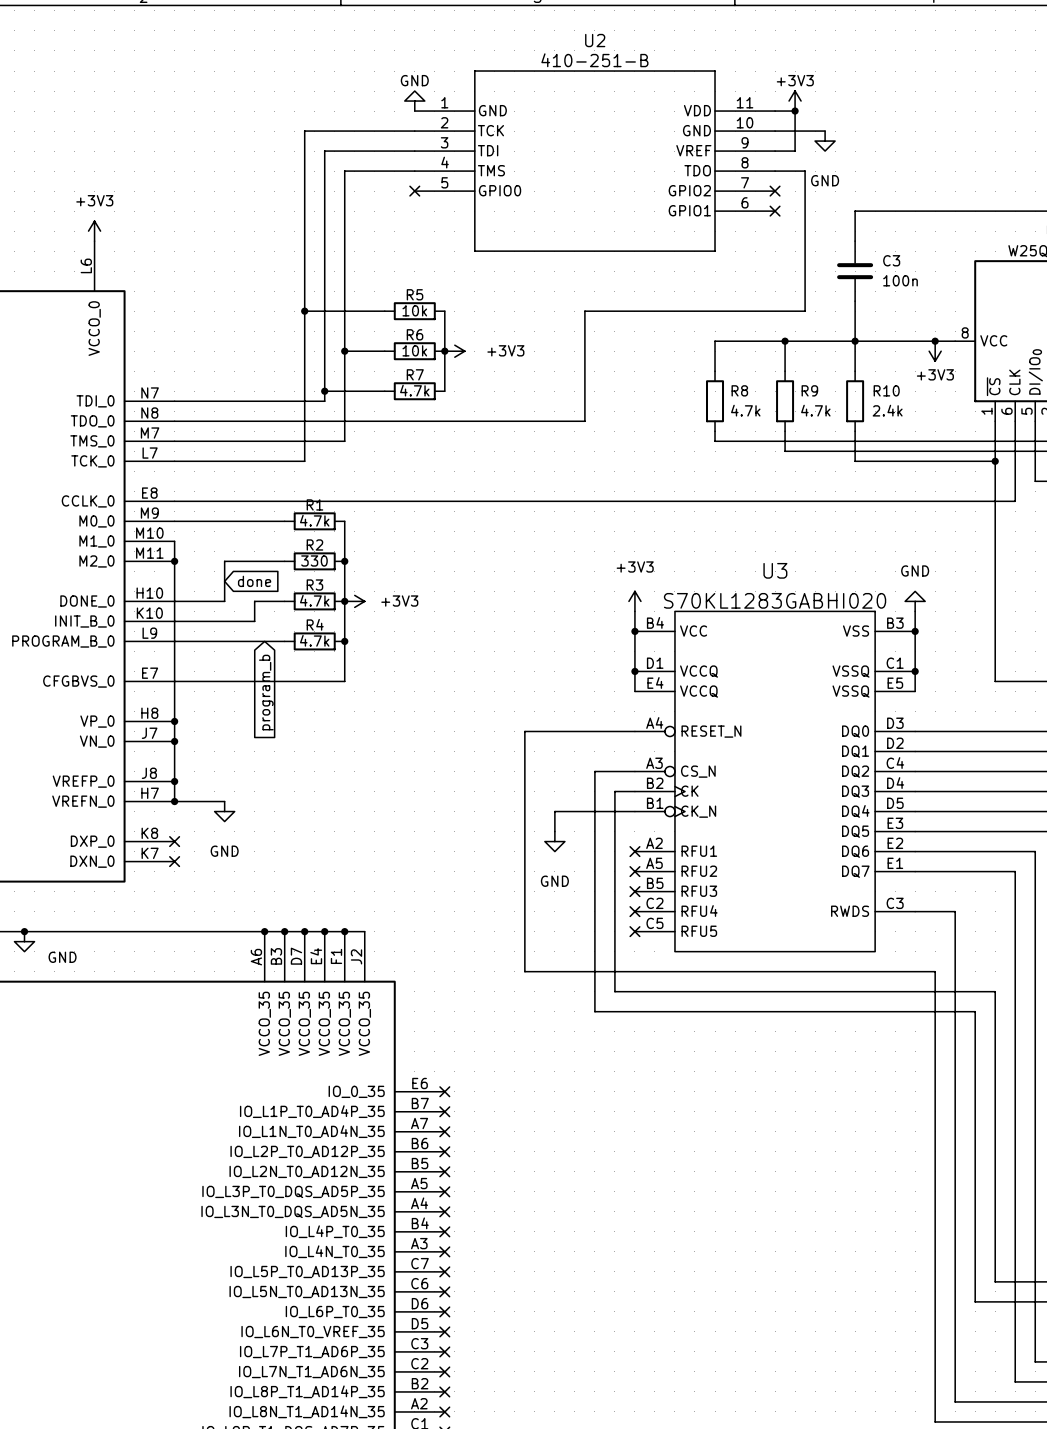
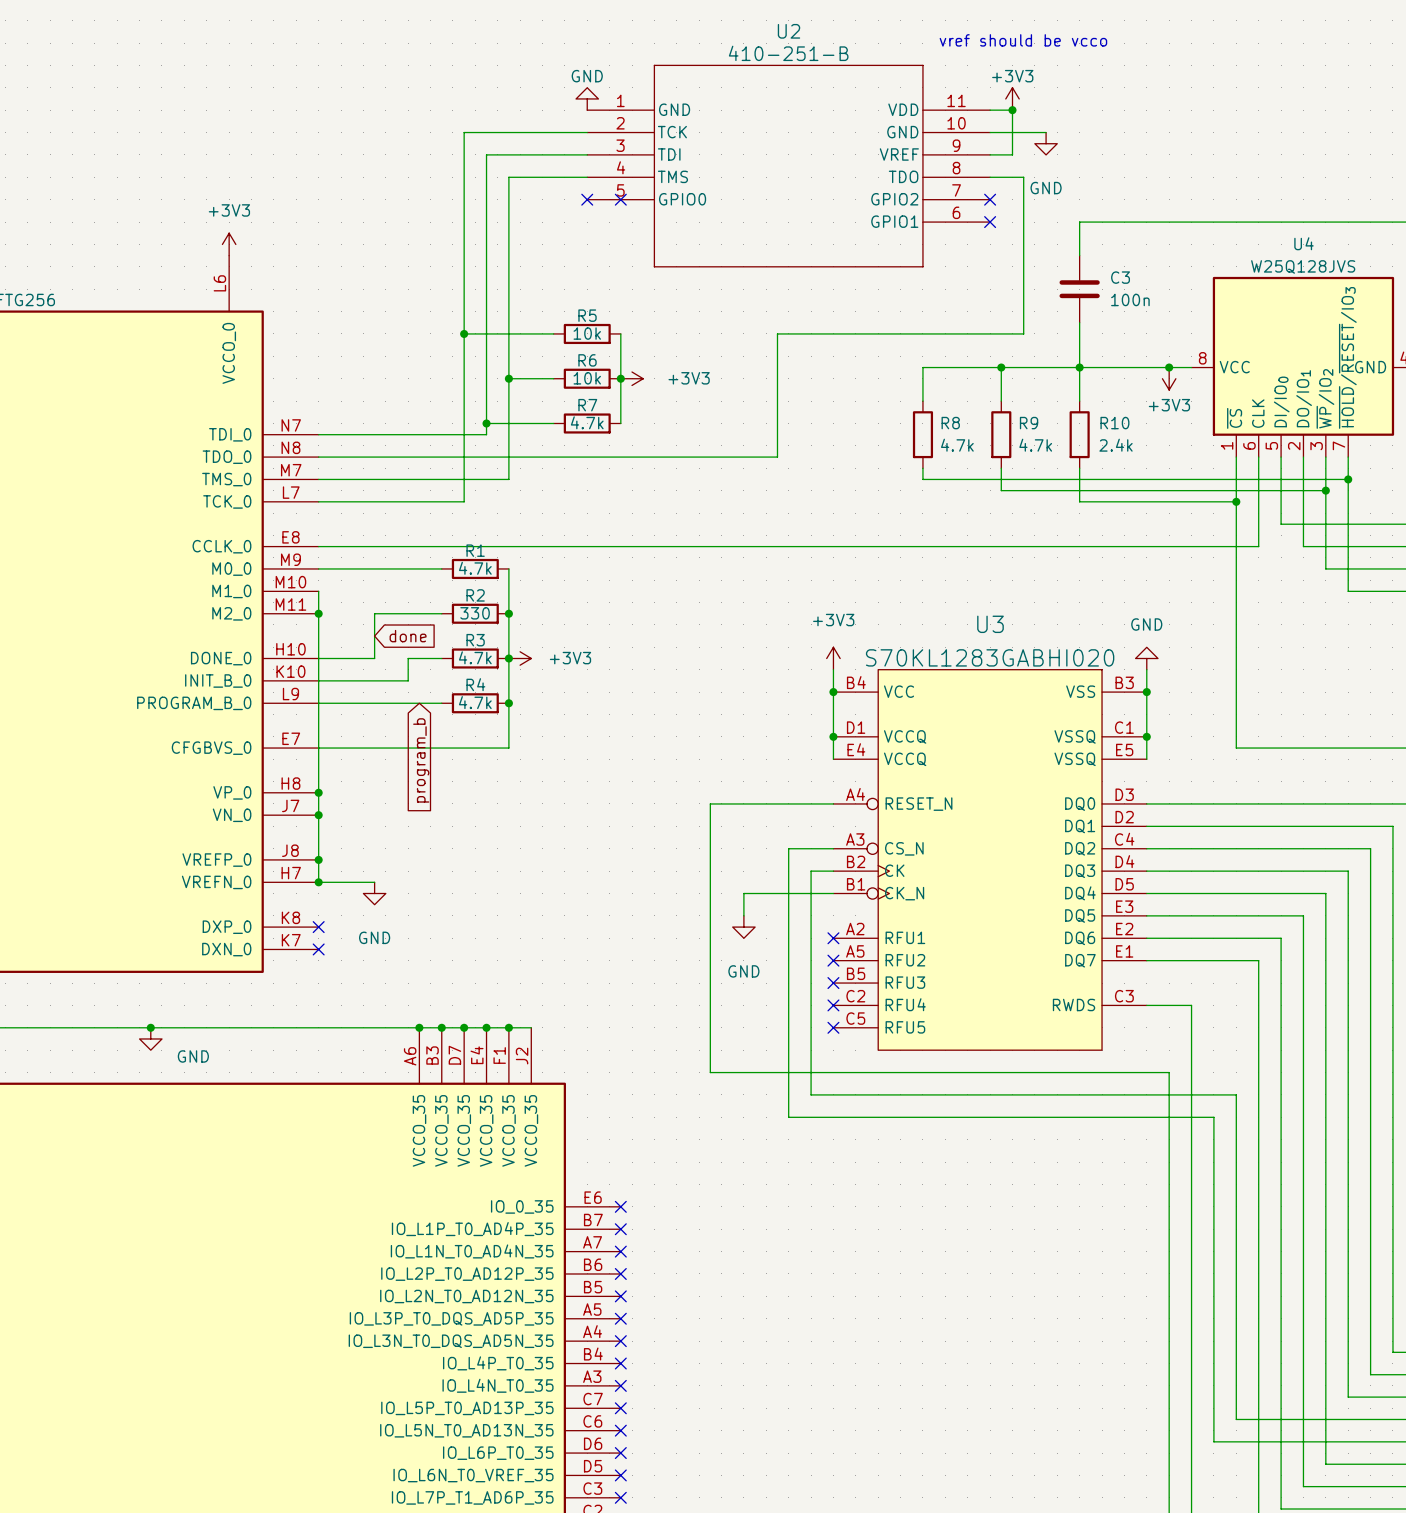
text: none -> vref should be vcco (1023, 40)
no-connect mark: none -> (620, 199)

